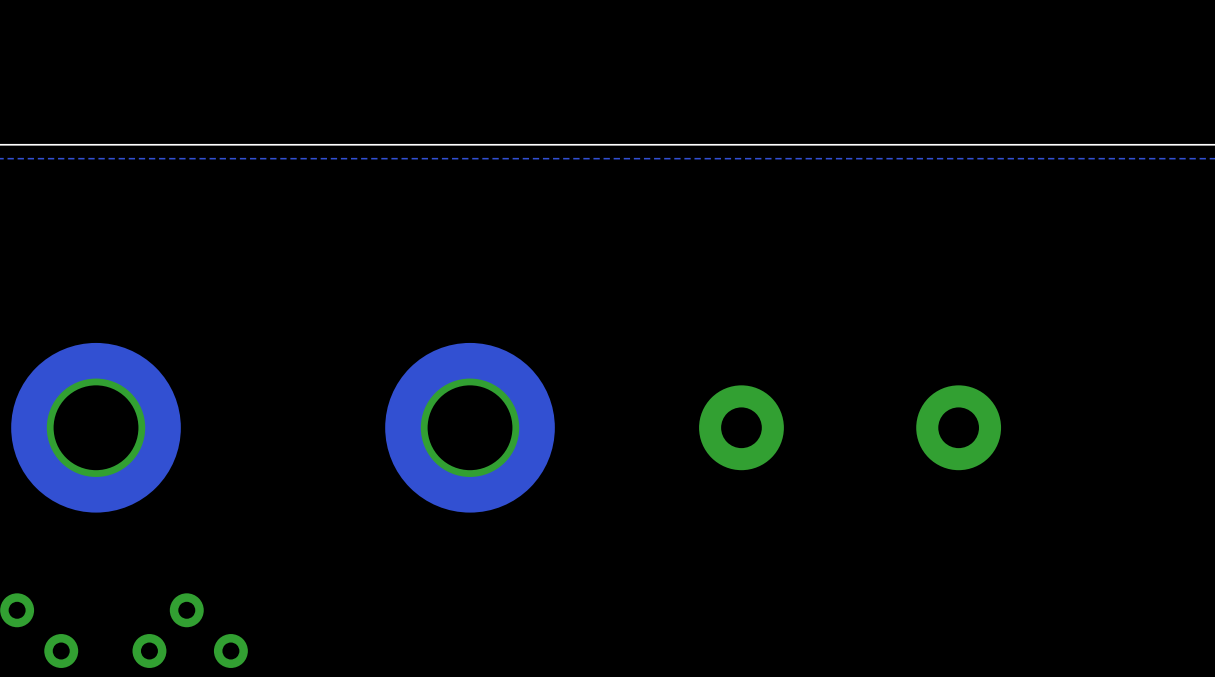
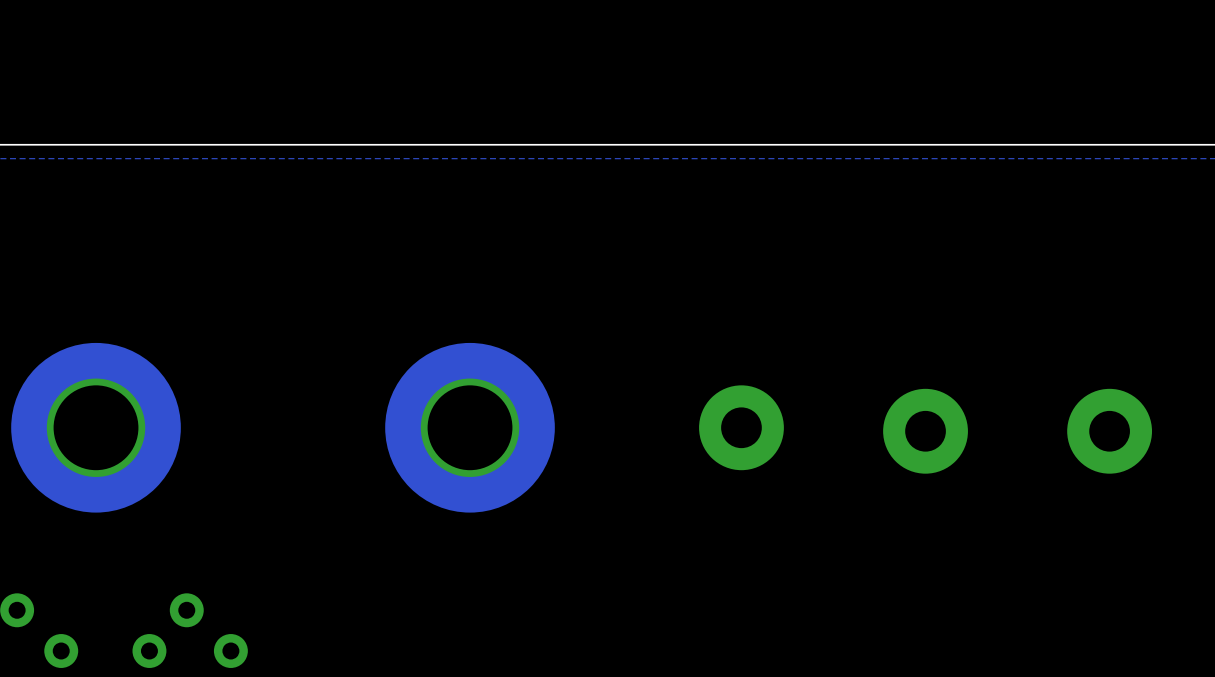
part position: (958, 427) -> (925, 431)
part: none -> (1109, 431)

